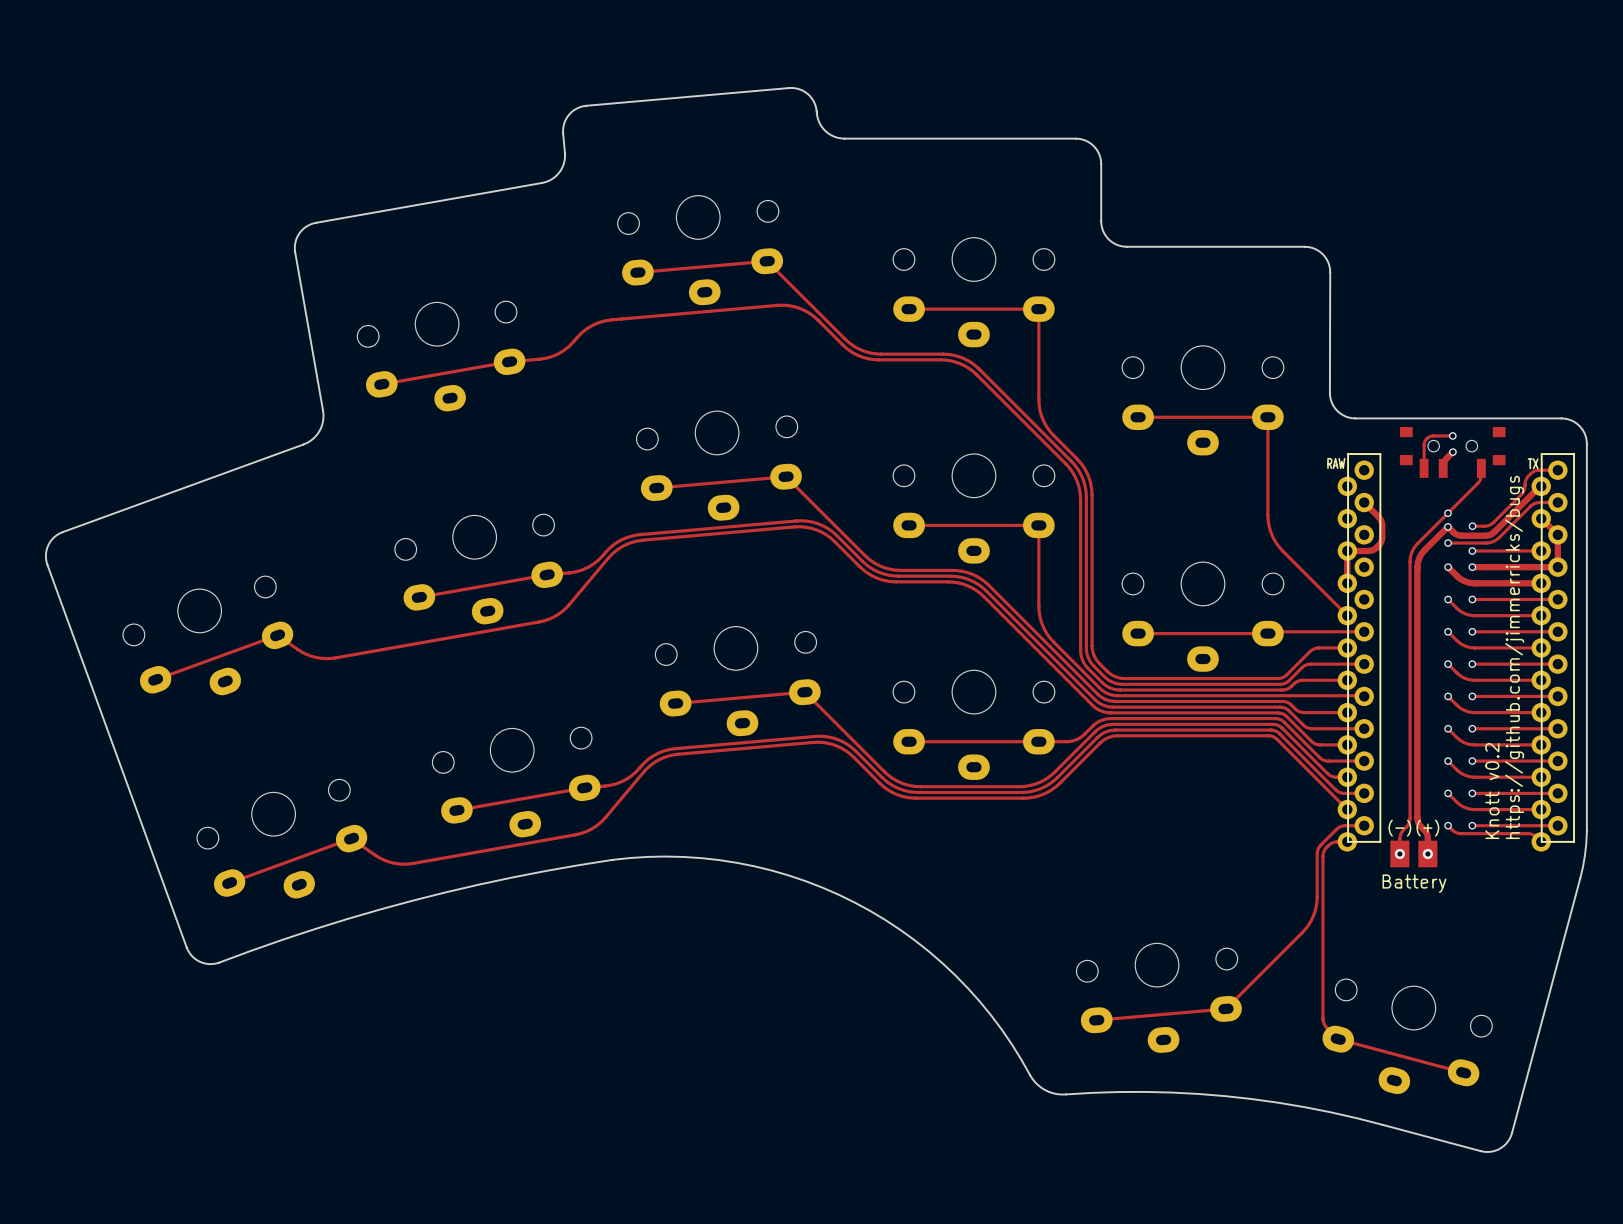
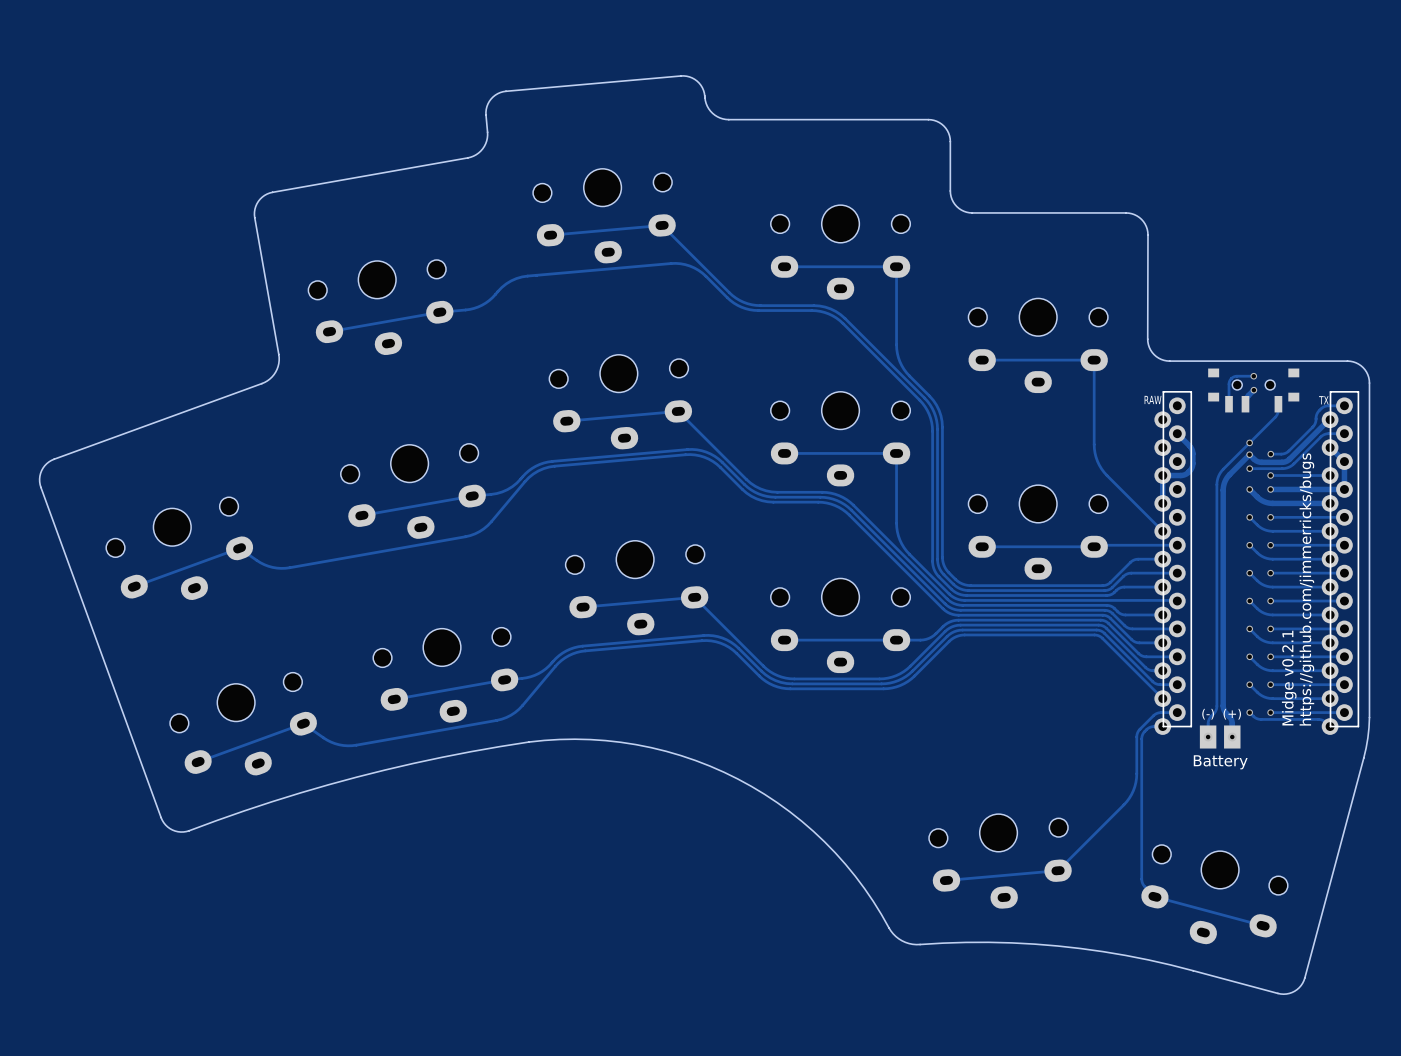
text: Knott v0.2 (1492, 791) -> Midge v0.2.1 (1289, 678)

